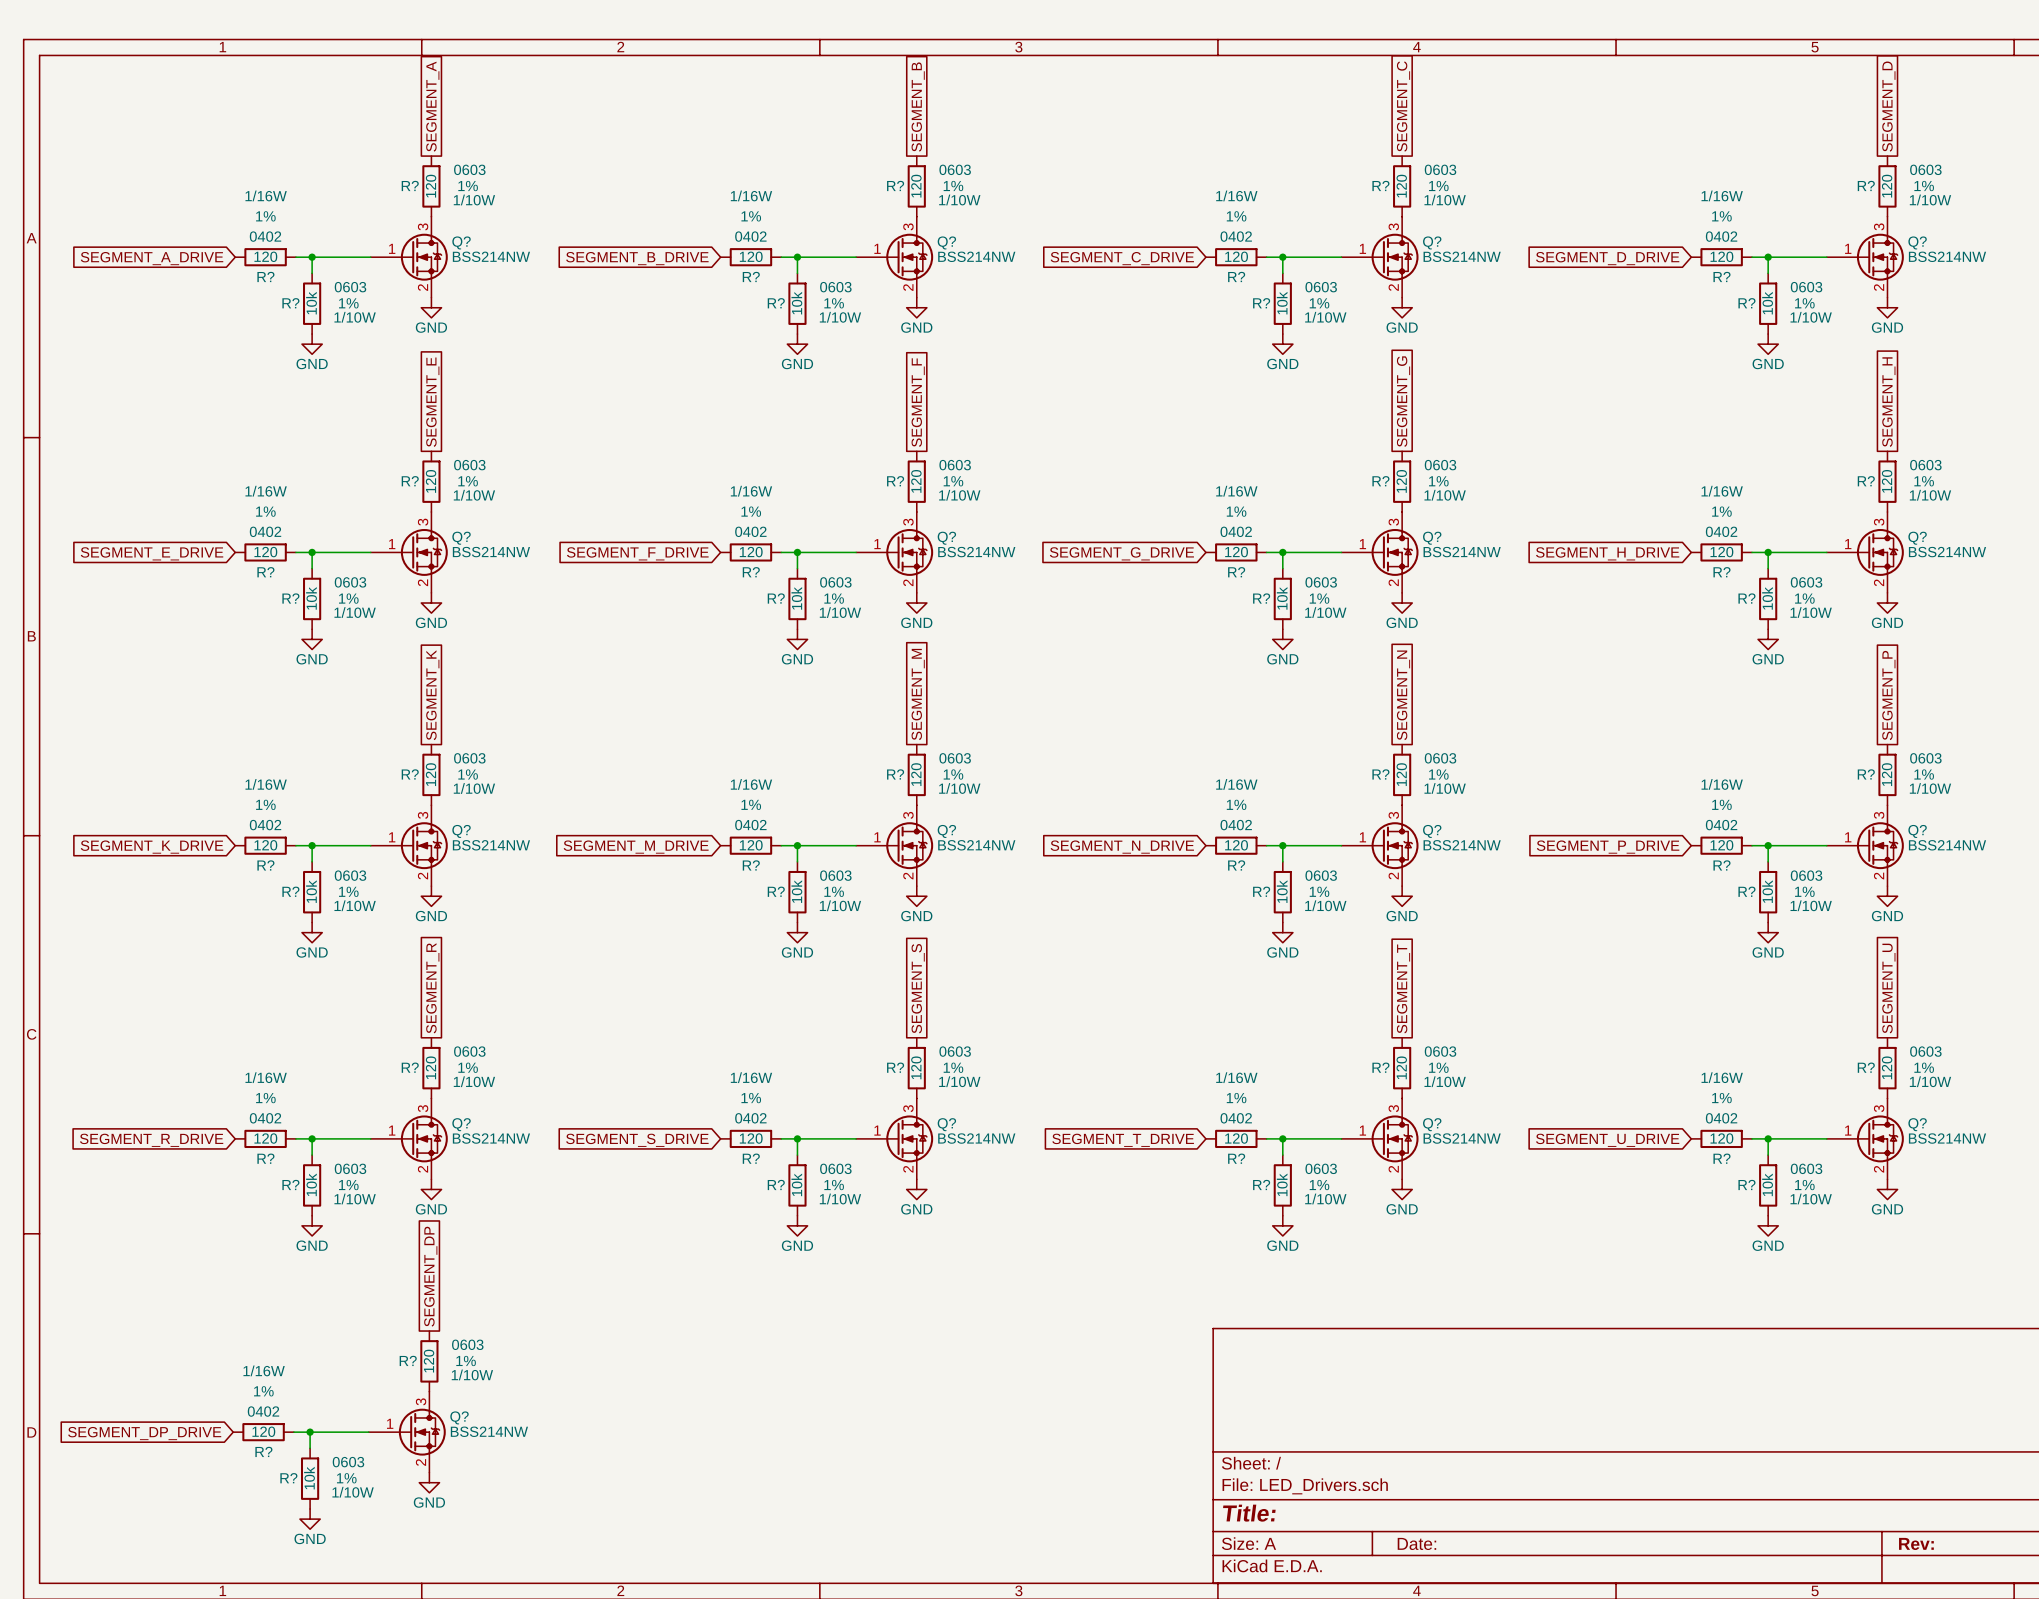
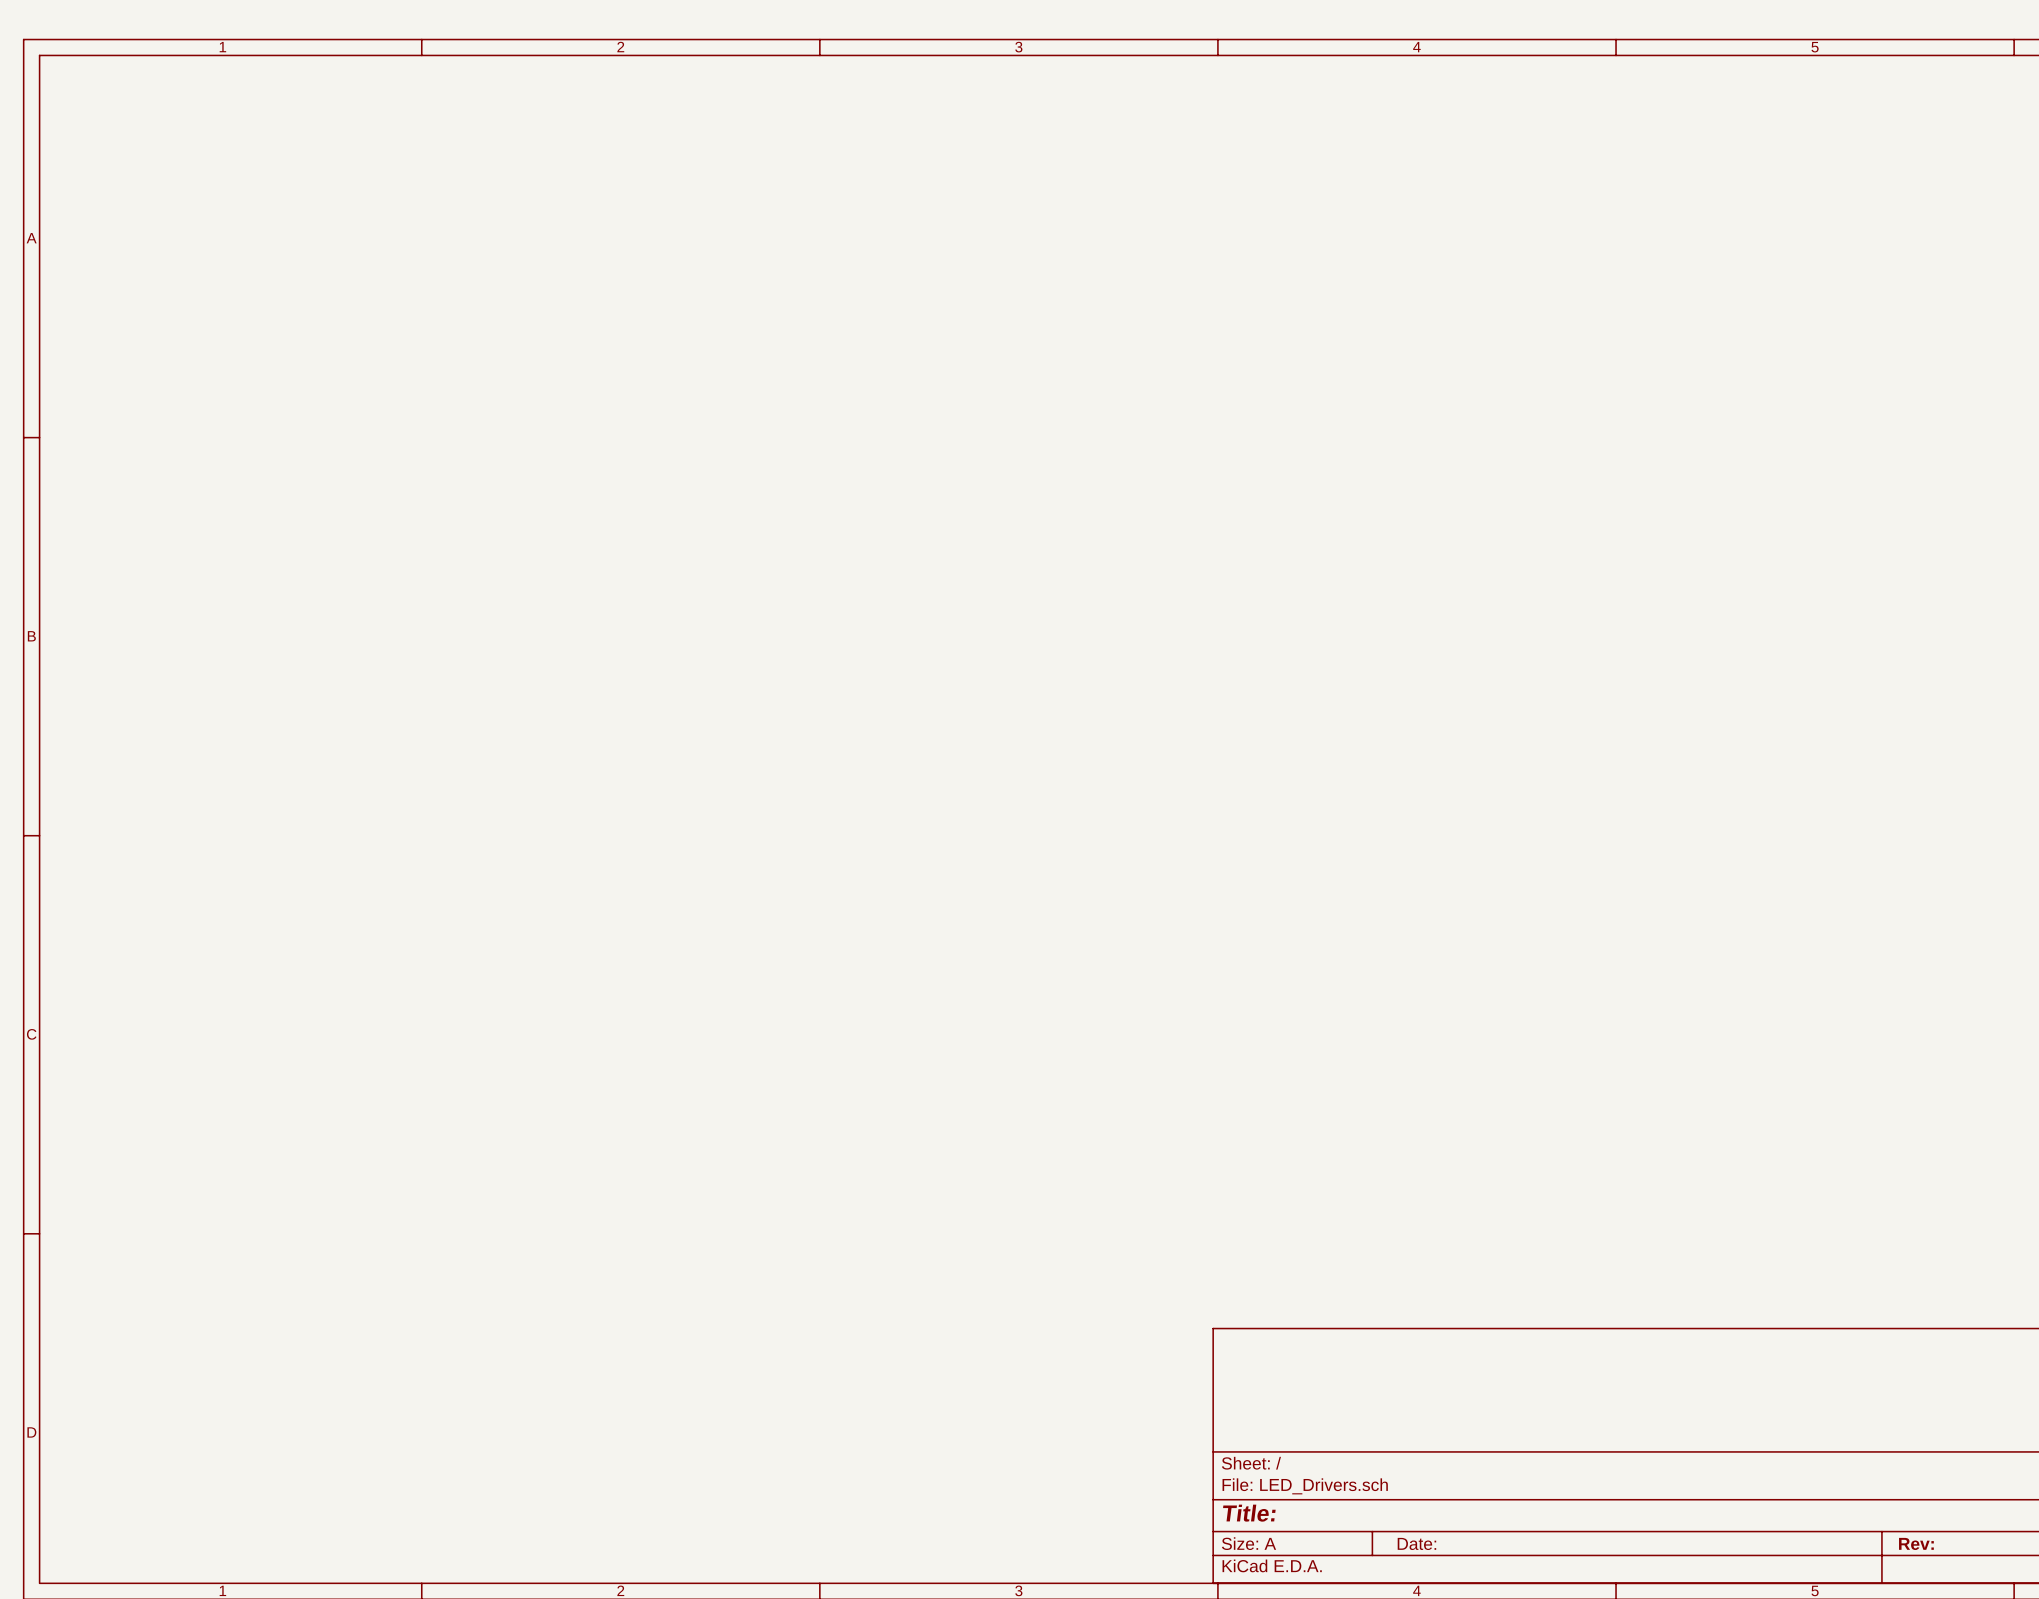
global label: SEGMENT_A (432, 106) -> none
global label: SEGMENT_C (1403, 106) -> none
global label: SEGMENT_D (1888, 106) -> none
global label: SEGMENT_B (918, 107) -> none
R?: 120 (431, 186) -> none
R?: 120 (916, 186) -> none
R?: 120 (1402, 186) -> none
R?: 120 (1887, 186) -> none
R?: 120 (265, 257) -> none
wire: (295, 257) (370, 257) -> none
wire: (312, 257) (312, 273) -> none
junction: (312, 257) -> none
Q?: BSS214NW (409, 257) -> none
R?: 120 (750, 257) -> none
wire: (781, 257) (856, 257) -> none
wire: (797, 257) (797, 273) -> none
junction: (797, 257) -> none
Q?: BSS214NW (894, 257) -> none
R?: 120 (1236, 257) -> none
wire: (1266, 257) (1341, 257) -> none
wire: (1282, 257) (1282, 273) -> none
junction: (1282, 257) -> none
Q?: BSS214NW (1379, 257) -> none
R?: 120 (1721, 257) -> none
wire: (1751, 257) (1826, 257) -> none
wire: (1768, 257) (1768, 273) -> none
junction: (1768, 257) -> none
Q?: BSS214NW (1865, 257) -> none
global label: SEGMENT_A_DRIVE (152, 258) -> none
global label: SEGMENT_B_DRIVE (637, 258) -> none
global label: SEGMENT_C_DRIVE (1122, 258) -> none
global label: SEGMENT_D_DRIVE (1607, 258) -> none
R?: 10k (312, 303) -> none
R?: 10k (797, 303) -> none
R?: 10k (1282, 303) -> none
R?: 10k (1768, 303) -> none
power symbol: GND (431, 307) -> none
power symbol: GND (916, 307) -> none
power symbol: GND (1402, 307) -> none
power symbol: GND (1887, 307) -> none
power symbol: GND (312, 344) -> none
power symbol: GND (797, 344) -> none
power symbol: GND (1282, 344) -> none
power symbol: GND (1768, 344) -> none
global label: SEGMENT_G (1403, 401) -> none
global label: SEGMENT_E (432, 402) -> none
global label: SEGMENT_F (918, 402) -> none
global label: SEGMENT_H (1888, 402) -> none
R?: 120 (431, 481) -> none
R?: 120 (916, 481) -> none
R?: 120 (1402, 481) -> none
R?: 120 (1887, 481) -> none
R?: 120 (265, 552) -> none
wire: (295, 552) (370, 552) -> none
wire: (312, 552) (312, 568) -> none
junction: (312, 552) -> none
Q?: BSS214NW (409, 552) -> none
R?: 120 (750, 552) -> none
wire: (781, 552) (856, 552) -> none
wire: (797, 552) (797, 568) -> none
junction: (797, 552) -> none
Q?: BSS214NW (894, 552) -> none
R?: 120 (1236, 552) -> none
wire: (1266, 552) (1341, 552) -> none
wire: (1282, 552) (1282, 568) -> none
junction: (1282, 552) -> none
Q?: BSS214NW (1379, 552) -> none
R?: 120 (1721, 552) -> none
wire: (1751, 552) (1826, 552) -> none
wire: (1768, 552) (1768, 568) -> none
junction: (1768, 552) -> none
Q?: BSS214NW (1865, 552) -> none
global label: SEGMENT_E_DRIVE (152, 553) -> none
global label: SEGMENT_F_DRIVE (637, 553) -> none
global label: SEGMENT_G_DRIVE (1121, 553) -> none
global label: SEGMENT_H_DRIVE (1607, 553) -> none
R?: 10k (312, 598) -> none
R?: 10k (797, 598) -> none
R?: 10k (1282, 598) -> none
R?: 10k (1768, 598) -> none
power symbol: GND (431, 603) -> none
power symbol: GND (916, 603) -> none
power symbol: GND (1402, 603) -> none
power symbol: GND (1887, 603) -> none
power symbol: GND (312, 639) -> none
power symbol: GND (797, 639) -> none
power symbol: GND (1282, 639) -> none
power symbol: GND (1768, 639) -> none
global label: SEGMENT_M (918, 694) -> none
global label: SEGMENT_K (432, 695) -> none
global label: SEGMENT_N (1403, 695) -> none
global label: SEGMENT_P (1888, 695) -> none
R?: 120 (431, 774) -> none
R?: 120 (916, 774) -> none
R?: 120 (1402, 774) -> none
R?: 120 (1887, 774) -> none
R?: 120 (265, 845) -> none
wire: (295, 845) (370, 845) -> none
wire: (312, 845) (312, 861) -> none
junction: (312, 845) -> none
Q?: BSS214NW (409, 845) -> none
R?: 120 (750, 845) -> none
wire: (781, 845) (856, 845) -> none
wire: (797, 845) (797, 861) -> none
junction: (797, 845) -> none
Q?: BSS214NW (894, 845) -> none
R?: 120 (1236, 845) -> none
wire: (1266, 845) (1341, 845) -> none
wire: (1282, 845) (1282, 861) -> none
junction: (1282, 845) -> none
Q?: BSS214NW (1379, 845) -> none
R?: 120 (1721, 845) -> none
wire: (1751, 845) (1826, 845) -> none
wire: (1768, 845) (1768, 861) -> none
junction: (1768, 845) -> none
Q?: BSS214NW (1865, 845) -> none
global label: SEGMENT_K_DRIVE (152, 847) -> none
global label: SEGMENT_M_DRIVE (636, 847) -> none
global label: SEGMENT_N_DRIVE (1122, 847) -> none
global label: SEGMENT_P_DRIVE (1608, 847) -> none
R?: 10k (312, 892) -> none
R?: 10k (797, 892) -> none
R?: 10k (1282, 892) -> none
R?: 10k (1768, 892) -> none
power symbol: GND (431, 896) -> none
power symbol: GND (916, 896) -> none
power symbol: GND (1402, 896) -> none
power symbol: GND (1887, 896) -> none
power symbol: GND (312, 932) -> none
power symbol: GND (797, 932) -> none
power symbol: GND (1282, 932) -> none
power symbol: GND (1768, 932) -> none
global label: SEGMENT_R (432, 988) -> none
global label: SEGMENT_S (918, 988) -> none
global label: SEGMENT_T (1403, 988) -> none
global label: SEGMENT_U (1888, 988) -> none
R?: 120 (431, 1068) -> none
R?: 120 (916, 1068) -> none
R?: 120 (1402, 1068) -> none
R?: 120 (1887, 1068) -> none
R?: 120 (265, 1138) -> none
wire: (295, 1138) (370, 1138) -> none
wire: (312, 1138) (312, 1155) -> none
junction: (312, 1138) -> none
Q?: BSS214NW (409, 1138) -> none
R?: 120 (750, 1138) -> none
wire: (781, 1138) (856, 1138) -> none
wire: (797, 1138) (797, 1155) -> none
junction: (797, 1138) -> none
Q?: BSS214NW (894, 1138) -> none
R?: 120 (1236, 1138) -> none
wire: (1266, 1138) (1341, 1138) -> none
wire: (1282, 1138) (1282, 1155) -> none
junction: (1282, 1138) -> none
Q?: BSS214NW (1379, 1138) -> none
R?: 120 (1721, 1138) -> none
wire: (1751, 1138) (1826, 1138) -> none
wire: (1768, 1138) (1768, 1155) -> none
junction: (1768, 1138) -> none
Q?: BSS214NW (1865, 1138) -> none
global label: SEGMENT_R_DRIVE (151, 1140) -> none
global label: SEGMENT_S_DRIVE (637, 1140) -> none
global label: SEGMENT_T_DRIVE (1123, 1140) -> none
global label: SEGMENT_U_DRIVE (1607, 1140) -> none
R?: 10k (312, 1185) -> none
R?: 10k (797, 1185) -> none
R?: 10k (1282, 1185) -> none
R?: 10k (1768, 1185) -> none
power symbol: GND (431, 1189) -> none
power symbol: GND (916, 1189) -> none
power symbol: GND (1402, 1189) -> none
power symbol: GND (1887, 1189) -> none
power symbol: GND (312, 1225) -> none
power symbol: GND (797, 1225) -> none
power symbol: GND (1282, 1225) -> none
power symbol: GND (1768, 1225) -> none
global label: SEGMENT_DP (430, 1276) -> none
R?: 120 (429, 1361) -> none
R?: 120 (263, 1432) -> none
wire: (293, 1432) (368, 1432) -> none
wire: (310, 1432) (310, 1448) -> none
junction: (310, 1432) -> none
Q?: BSS214NW (407, 1432) -> none
global label: SEGMENT_DP_DRIVE (144, 1433) -> none
R?: 10k (310, 1478) -> none
power symbol: GND (429, 1482) -> none
power symbol: GND (310, 1519) -> none

